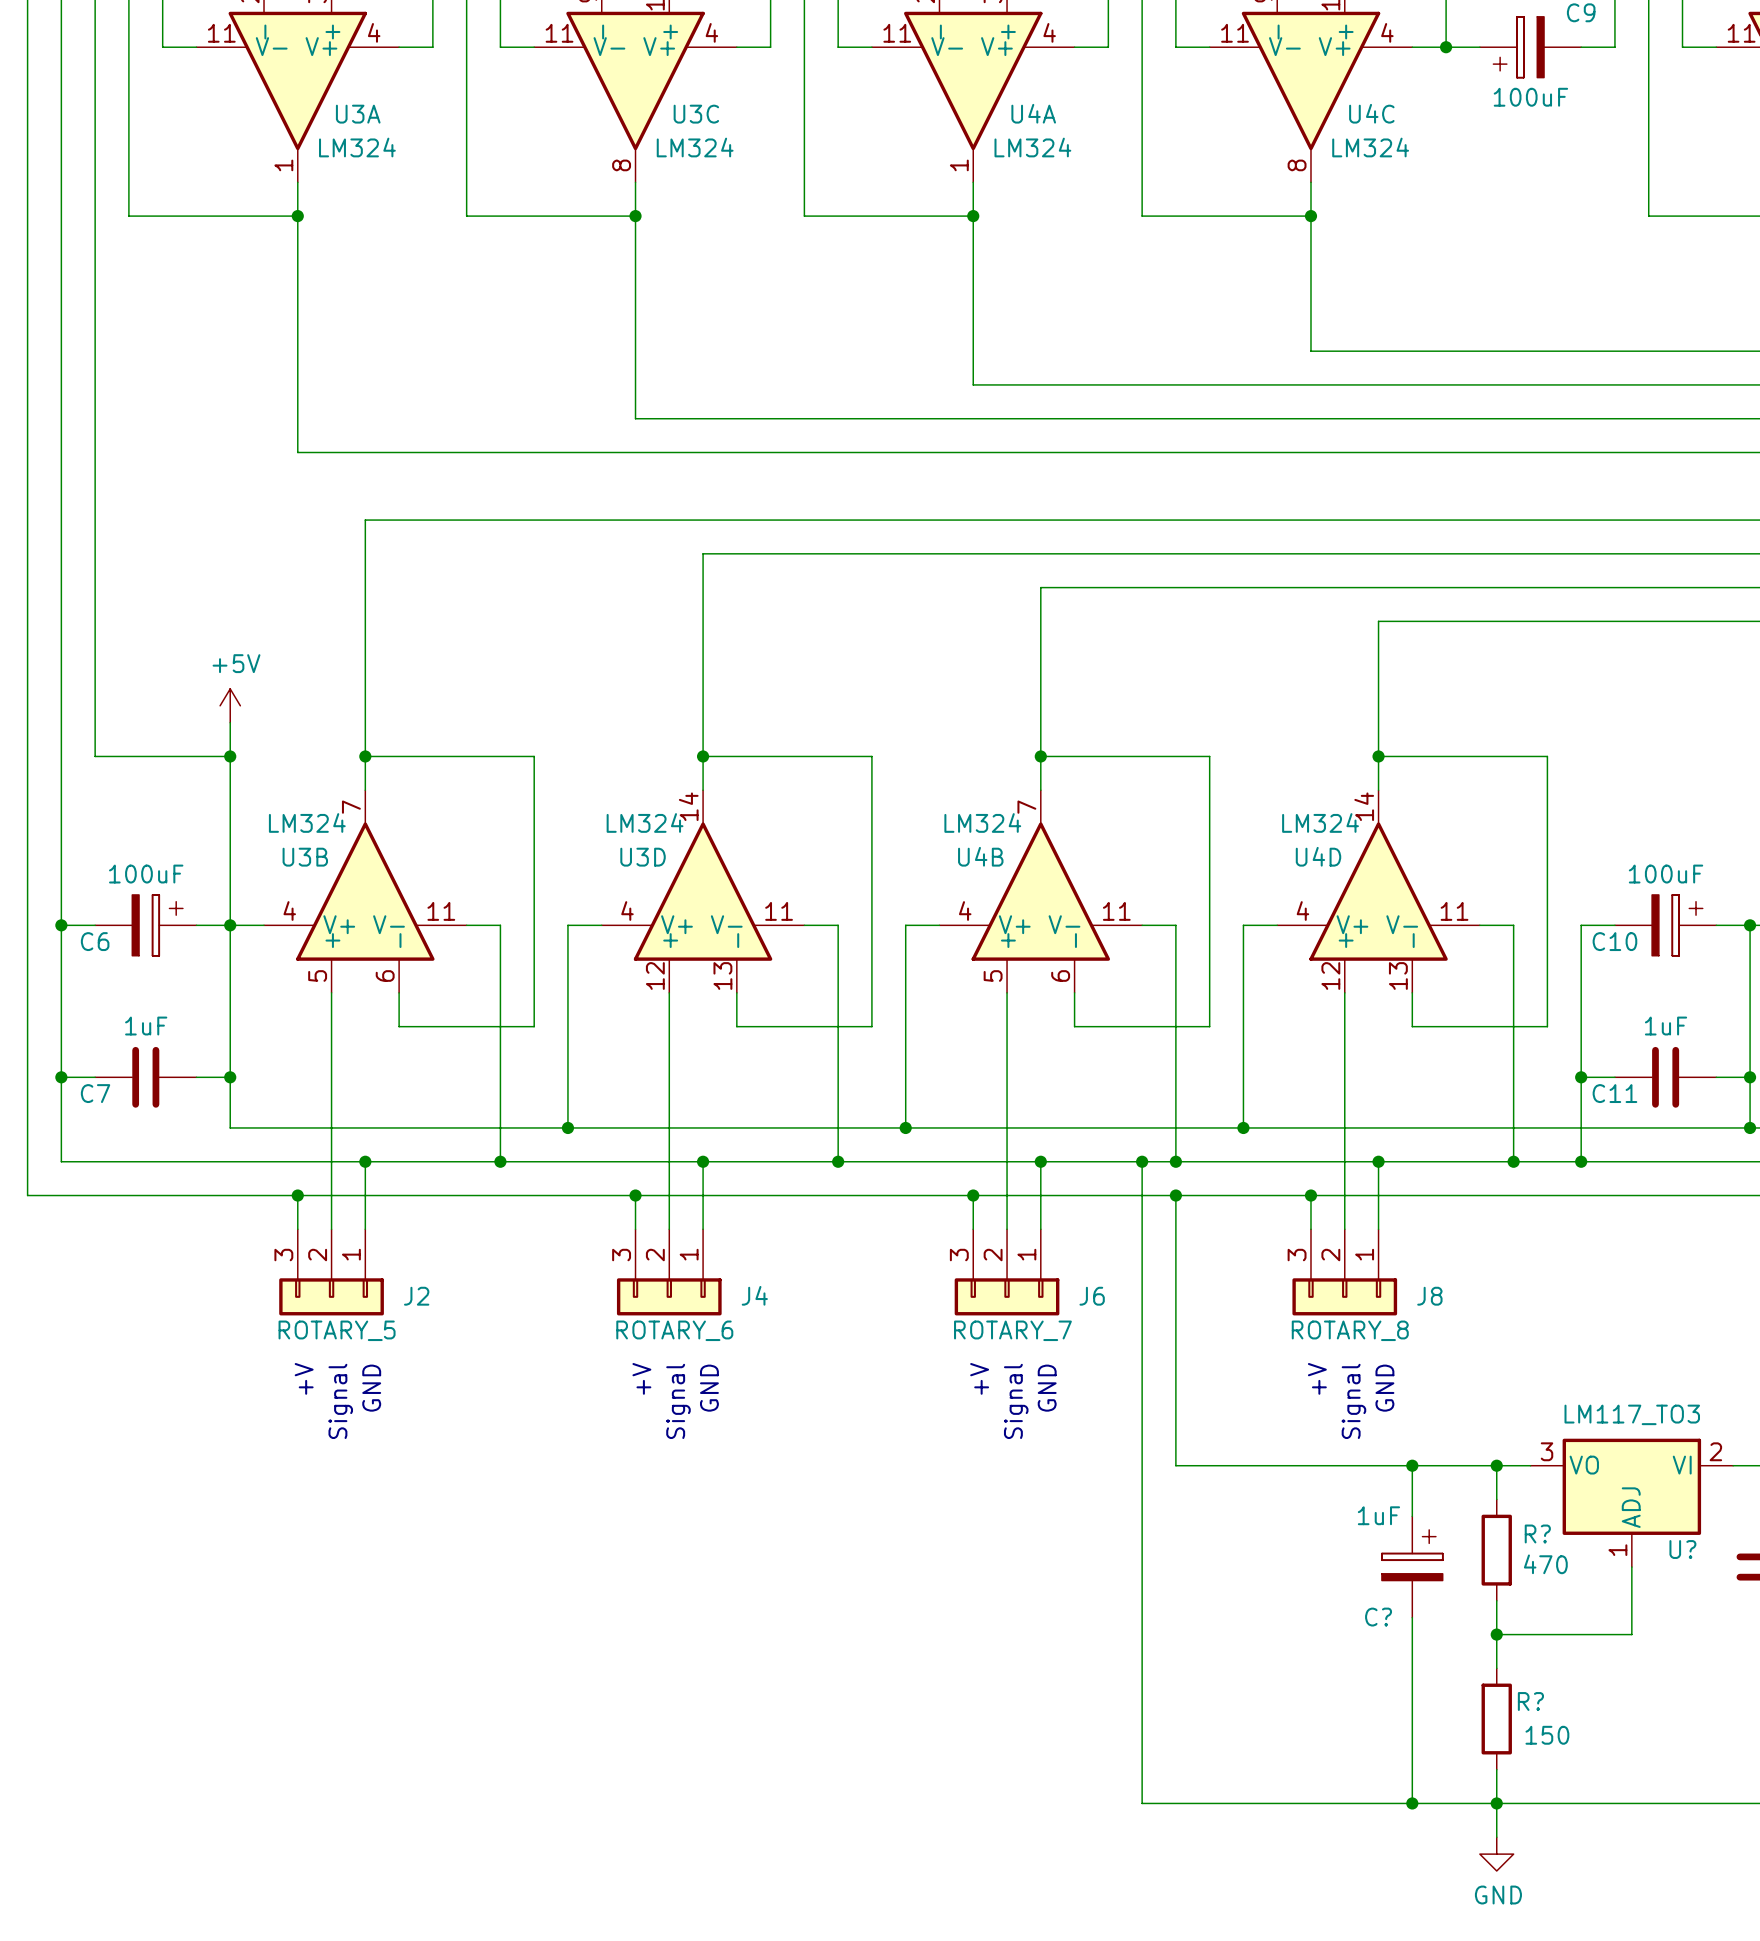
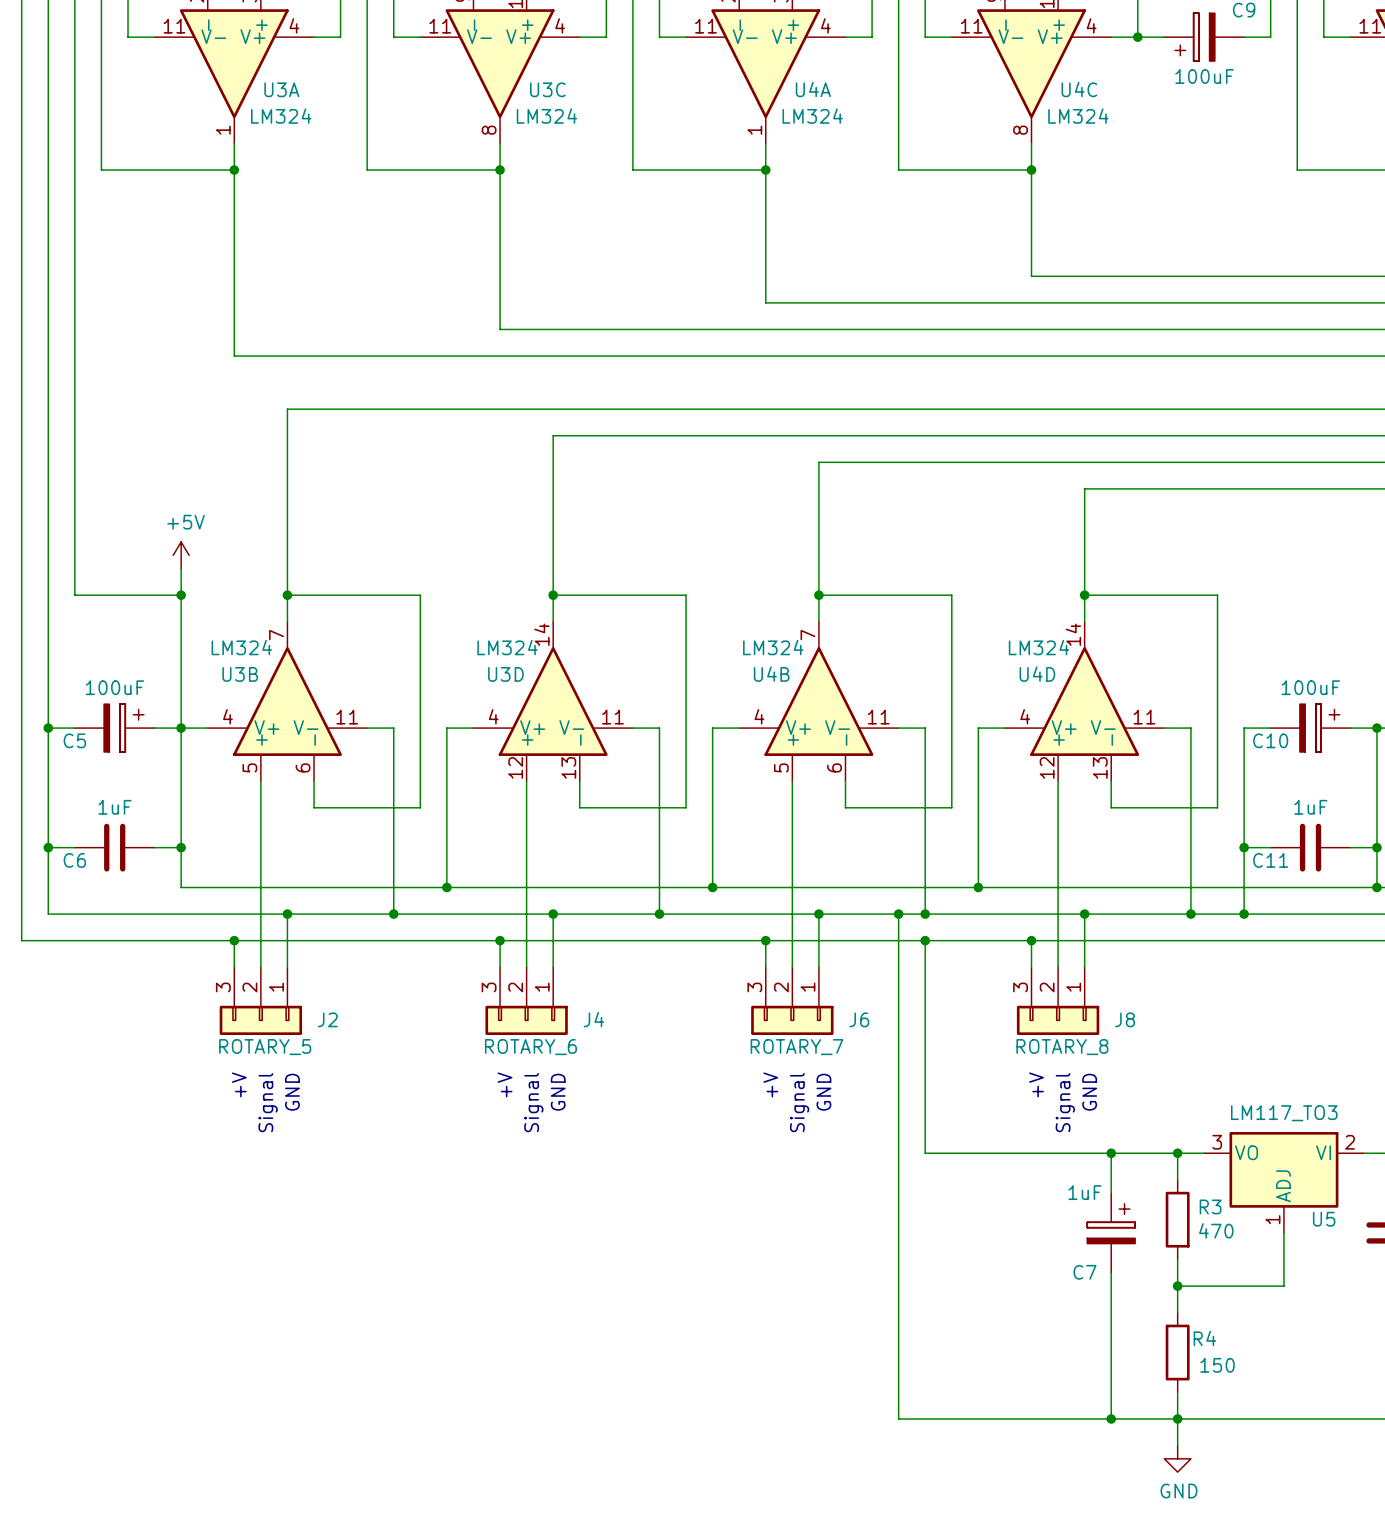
C6 name: C6 (95, 941) -> C5 (74, 740)
C7 name: C7 (95, 1093) -> C6 (74, 860)
R? name: R? (1537, 1533) -> R3 (1210, 1206)
U? name: U? (1682, 1549) -> U5 (1324, 1219)
C? name: C? (1378, 1617) -> C7 (1084, 1272)
R? name: R? (1530, 1701) -> R4 (1204, 1338)

